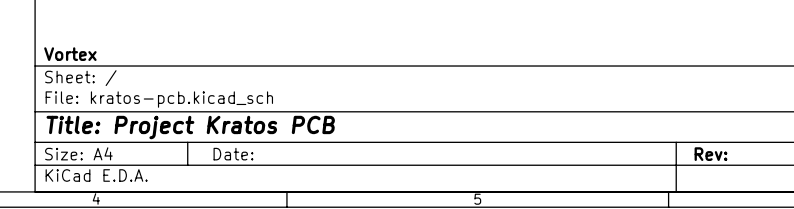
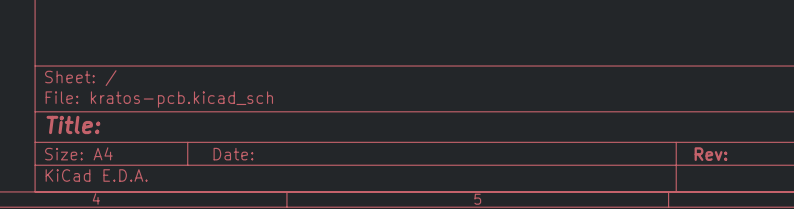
title block: Vortex (70, 54) -> none
title block: Title: Project Kratos PCB (190, 127) -> Title: (73, 124)

